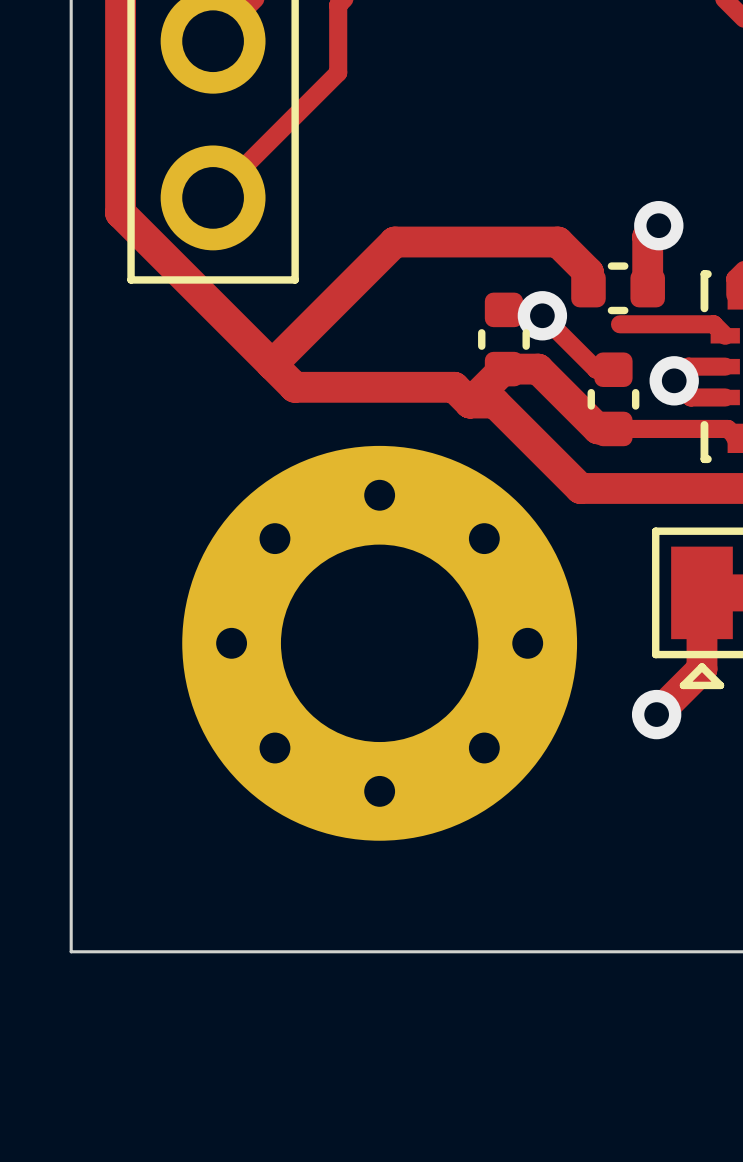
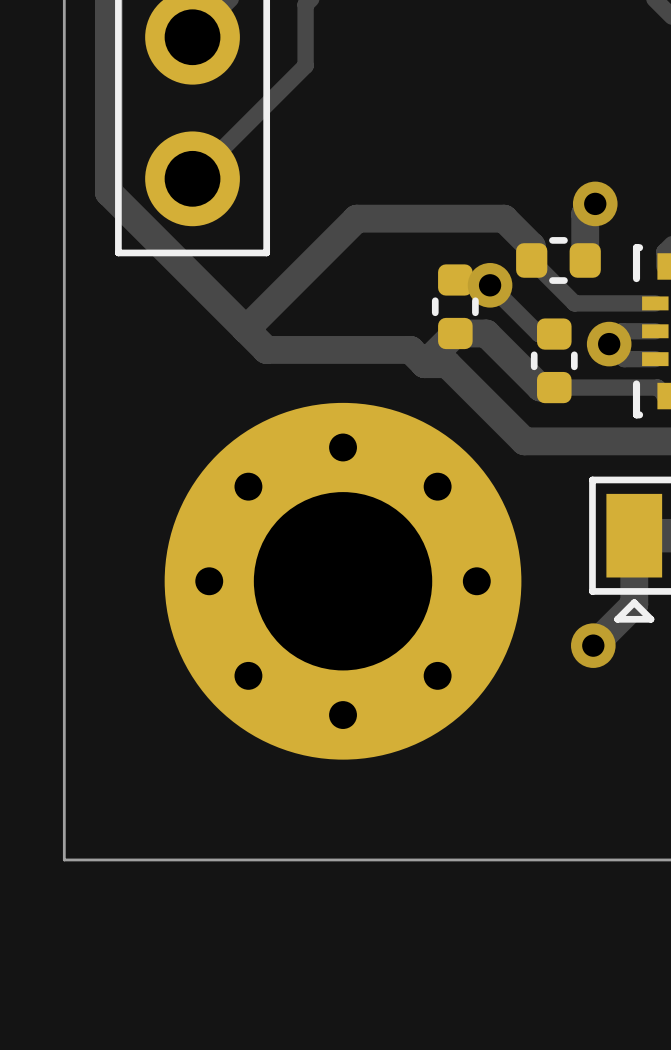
track: (620, 324) (713, 324) (725, 335) -> (531, 260) (574, 303) (655, 303)

